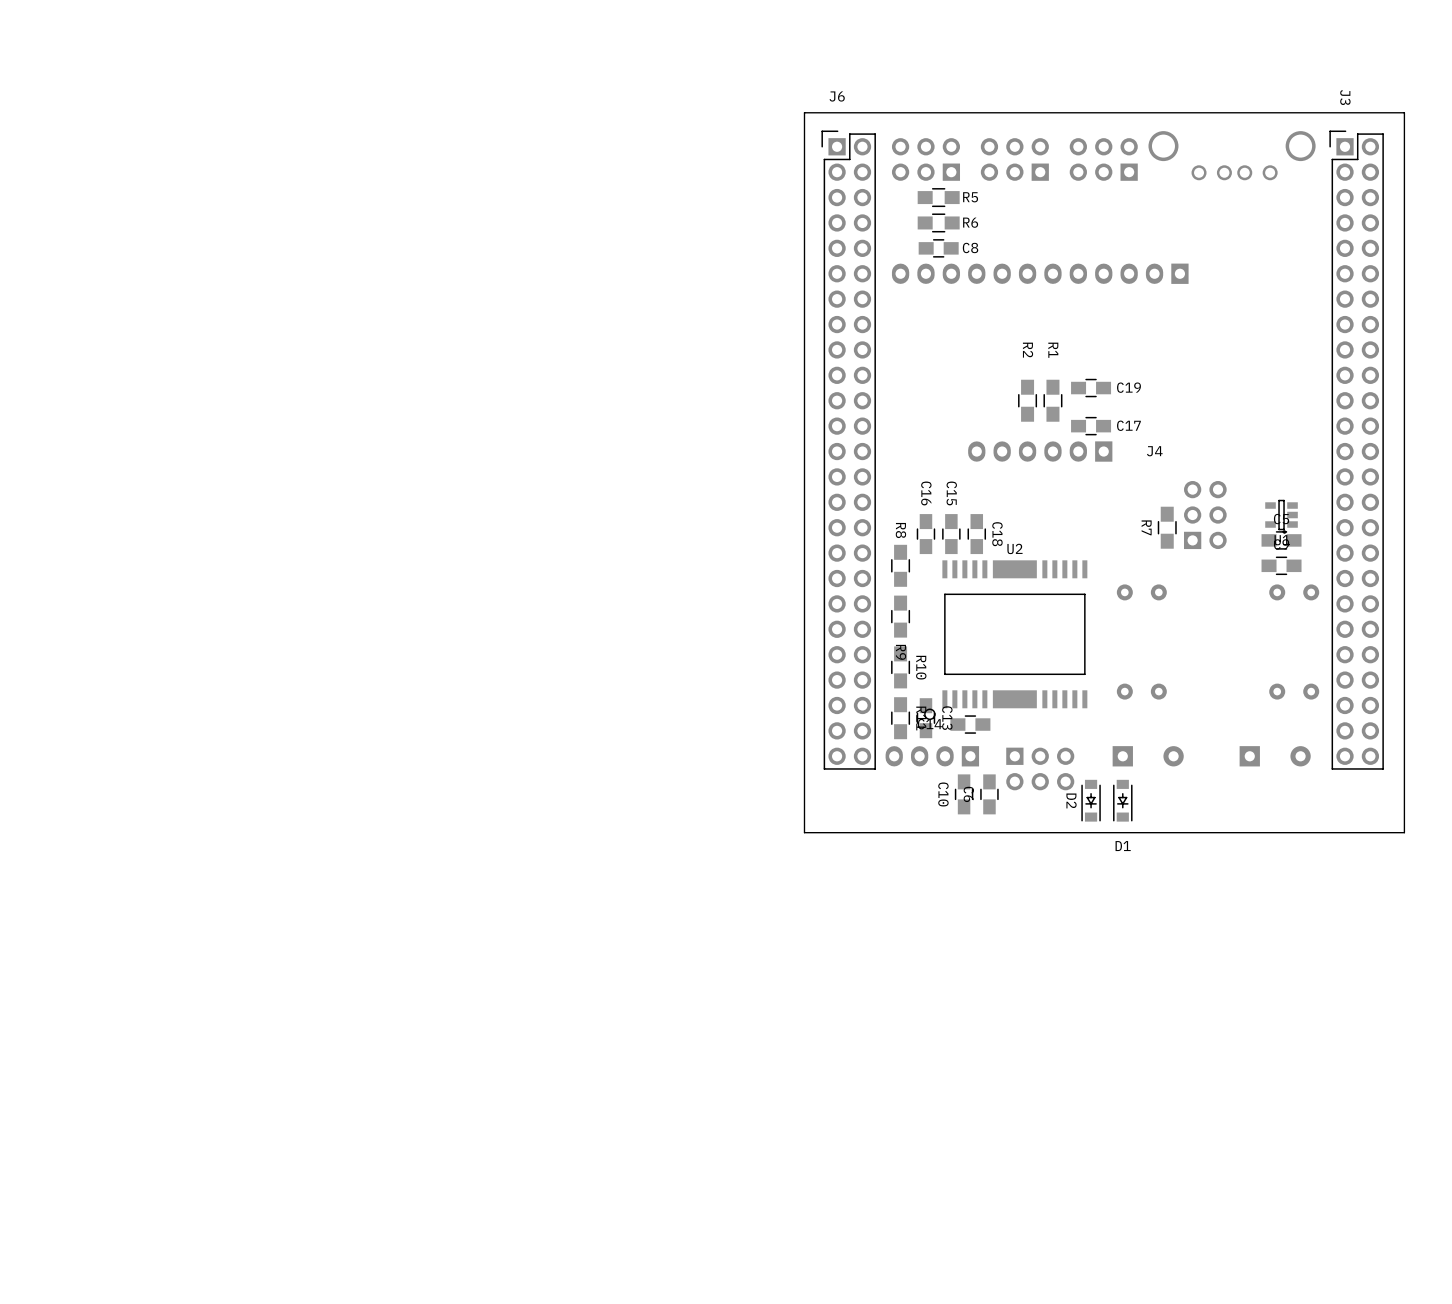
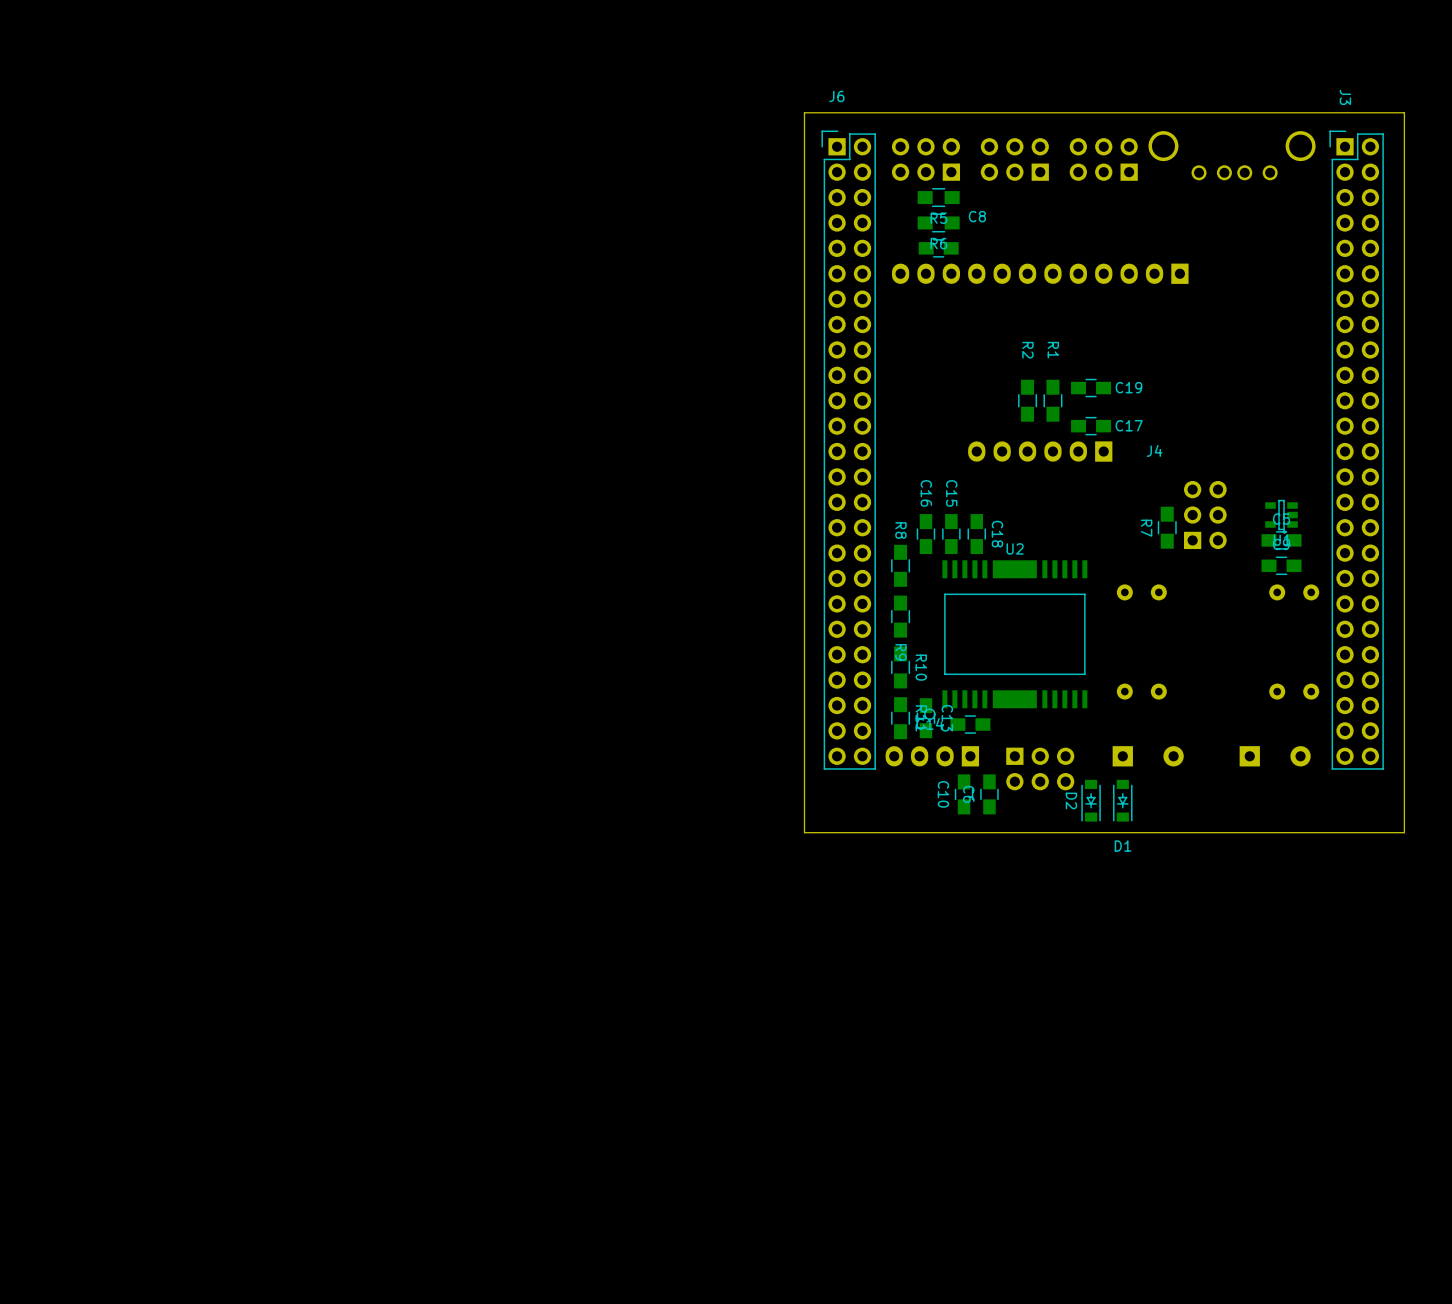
R5 name position: R5 (970, 197) -> R5 (938, 218)
R6 name position: R6 (970, 222) -> R6 (938, 243)
C8 name position: C8 (970, 247) -> C8 (977, 216)

